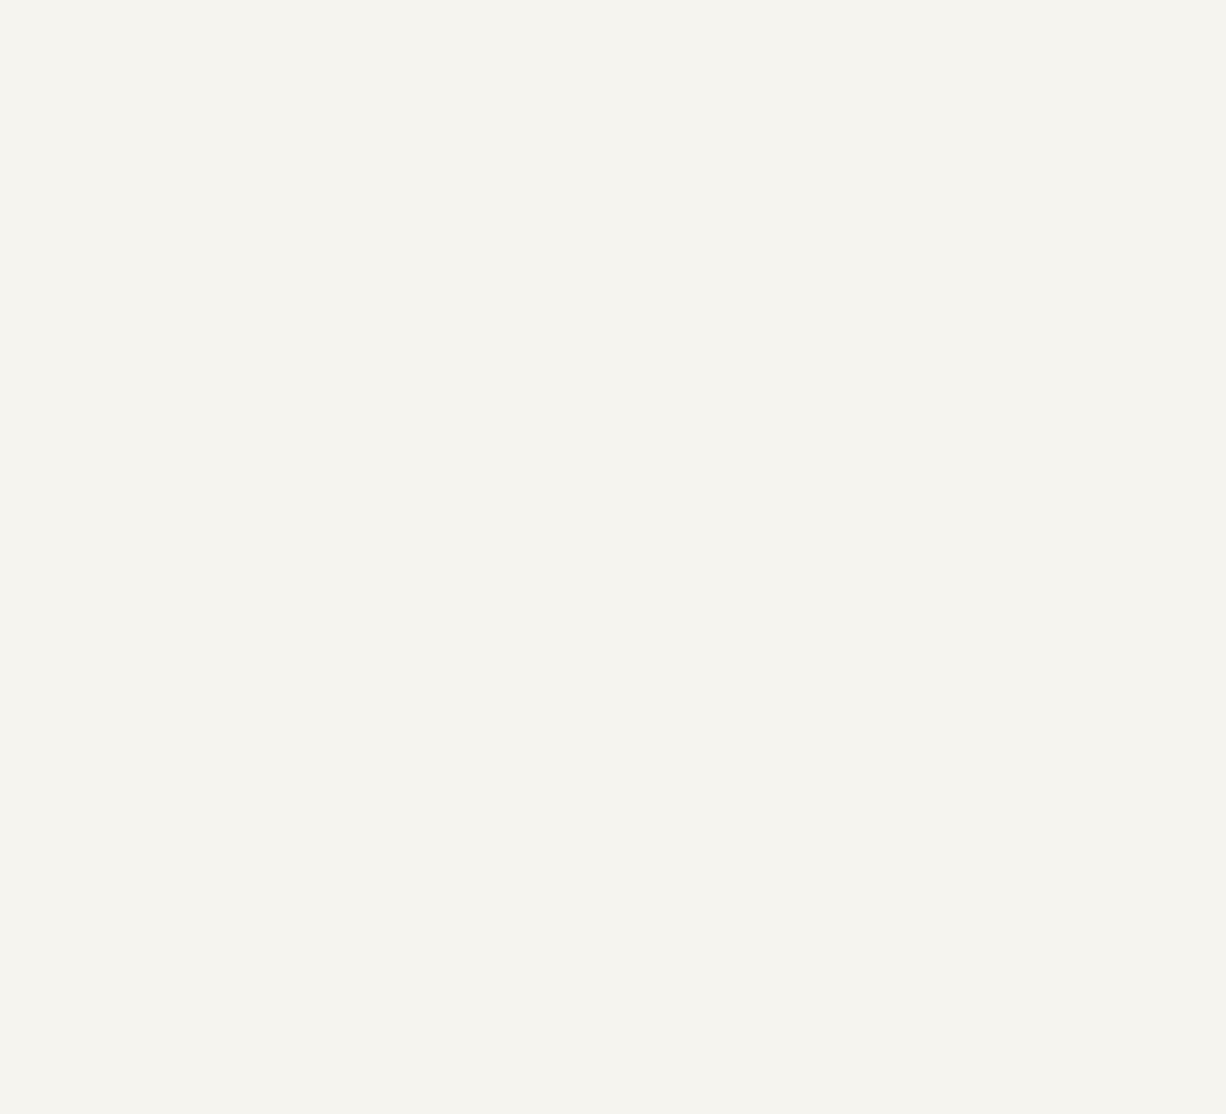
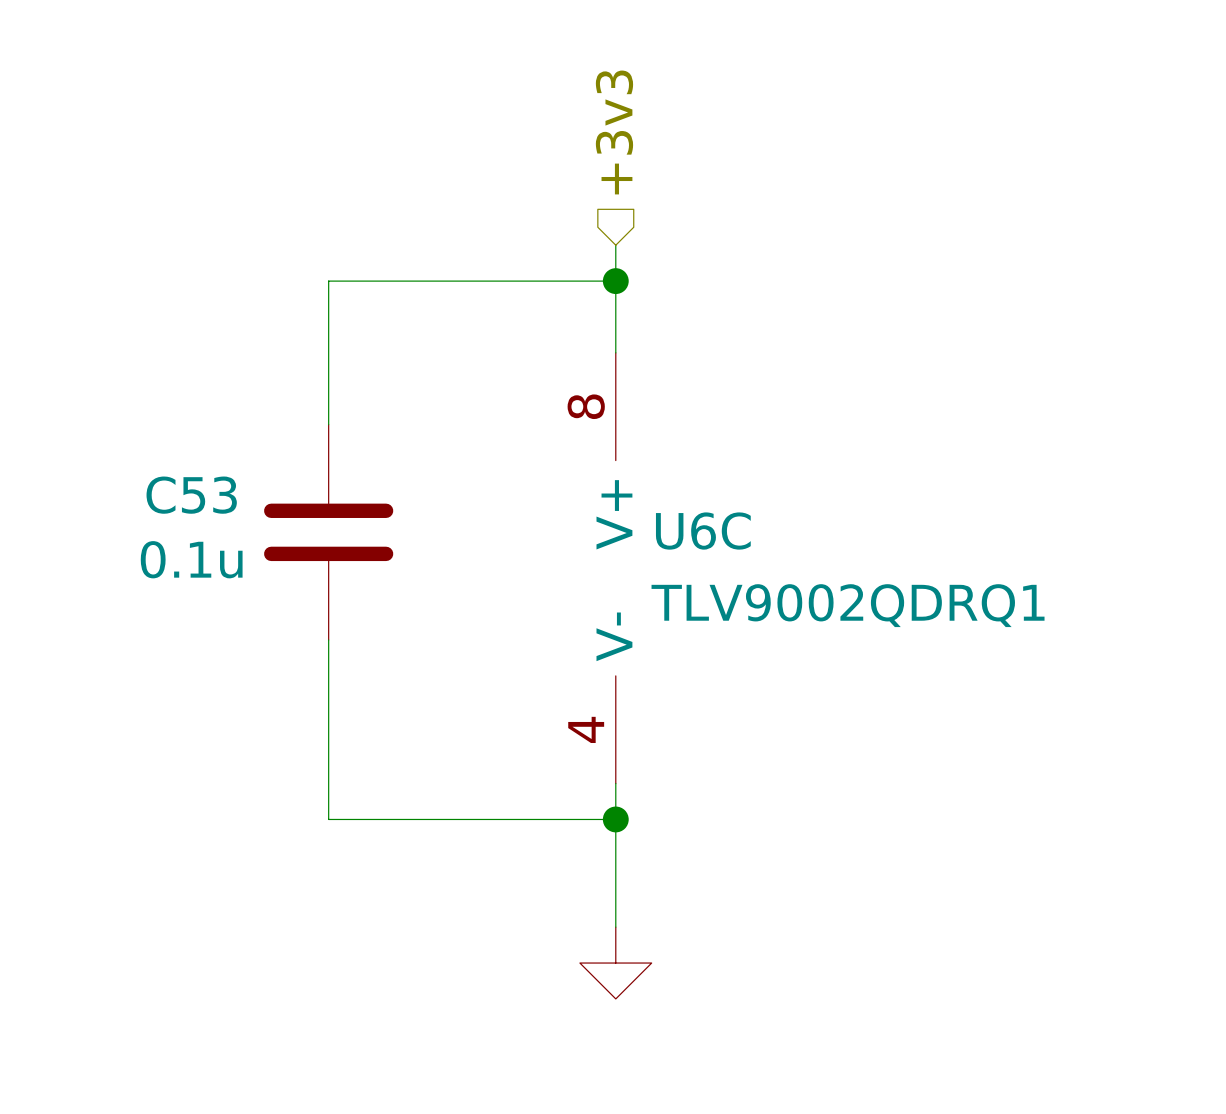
hierarchical label: none -> +3v3 (614, 132)
wire: none -> (615, 245) (615, 352)
wire: none -> (615, 281) (328, 281) (328, 424)
junction: none -> (615, 281)
C53: none -> 0.1u (328, 532)
U6C: none -> TLV9002QDRQ1 (615, 568)
wire: none -> (328, 640) (328, 819) (615, 819)
wire: none -> (615, 783) (615, 927)
junction: none -> (615, 819)
power symbol: none -> (615, 963)

